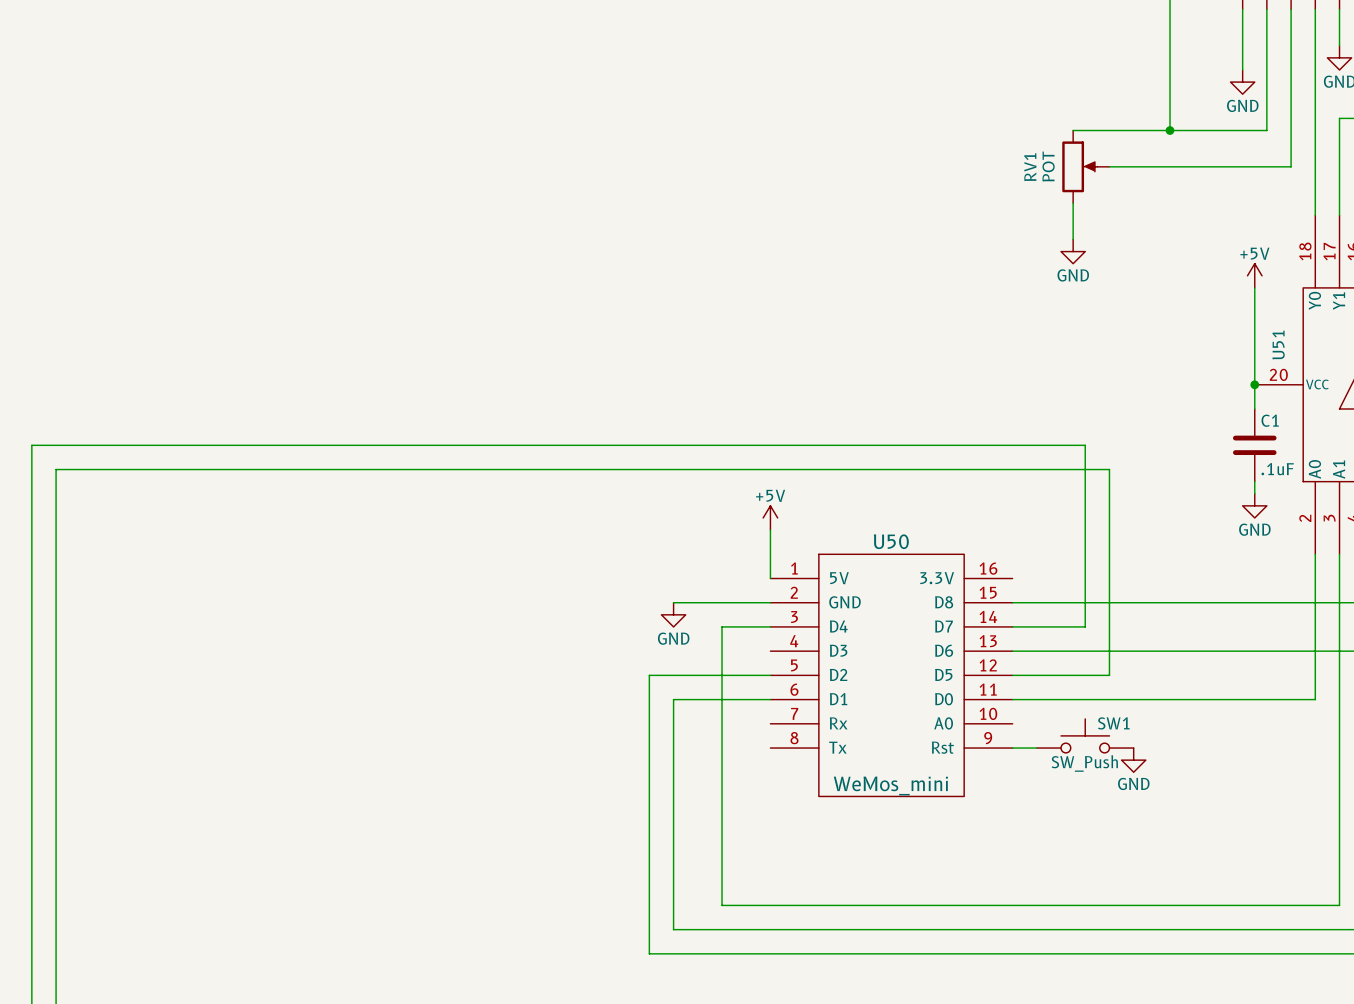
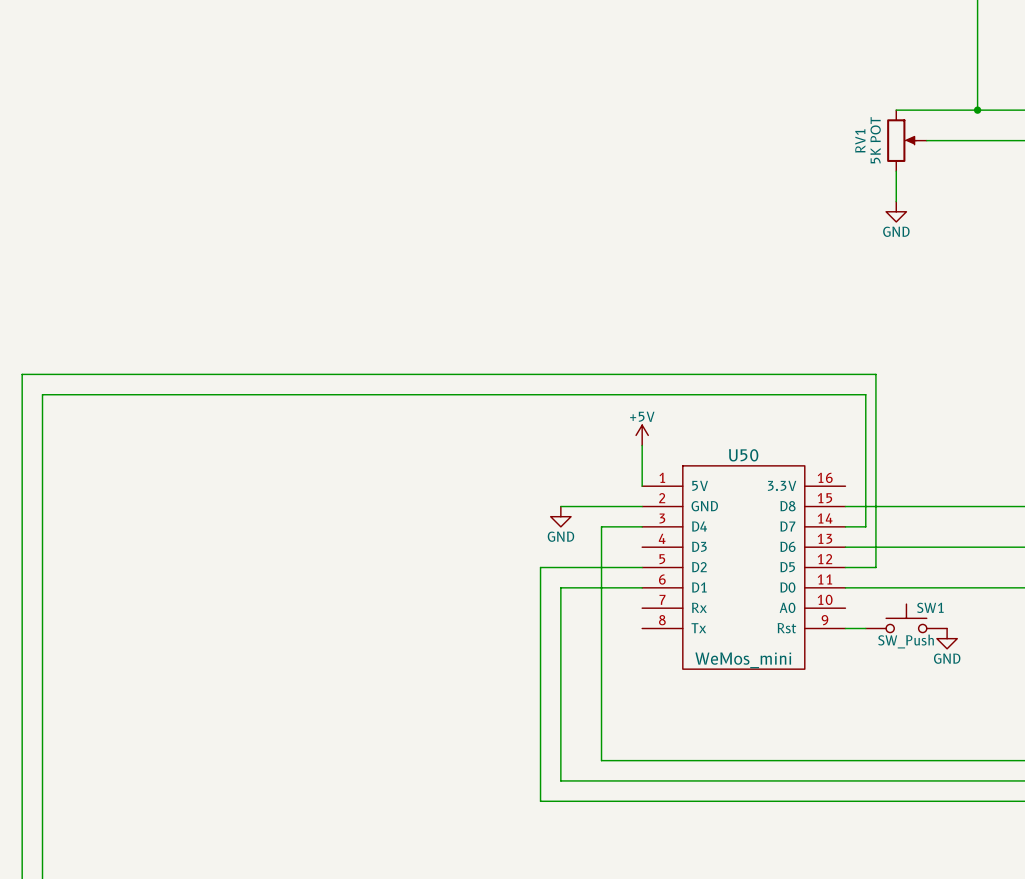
RV1 value: POT (1048, 166) -> 5K POT (875, 140)
wire: (1048, 445) (1085, 445) (1085, 626) (1036, 626) -> (865, 394) (865, 526)
wire: (1036, 469) (1109, 469) (1109, 675) (1048, 675) -> (875, 374) (875, 567)

